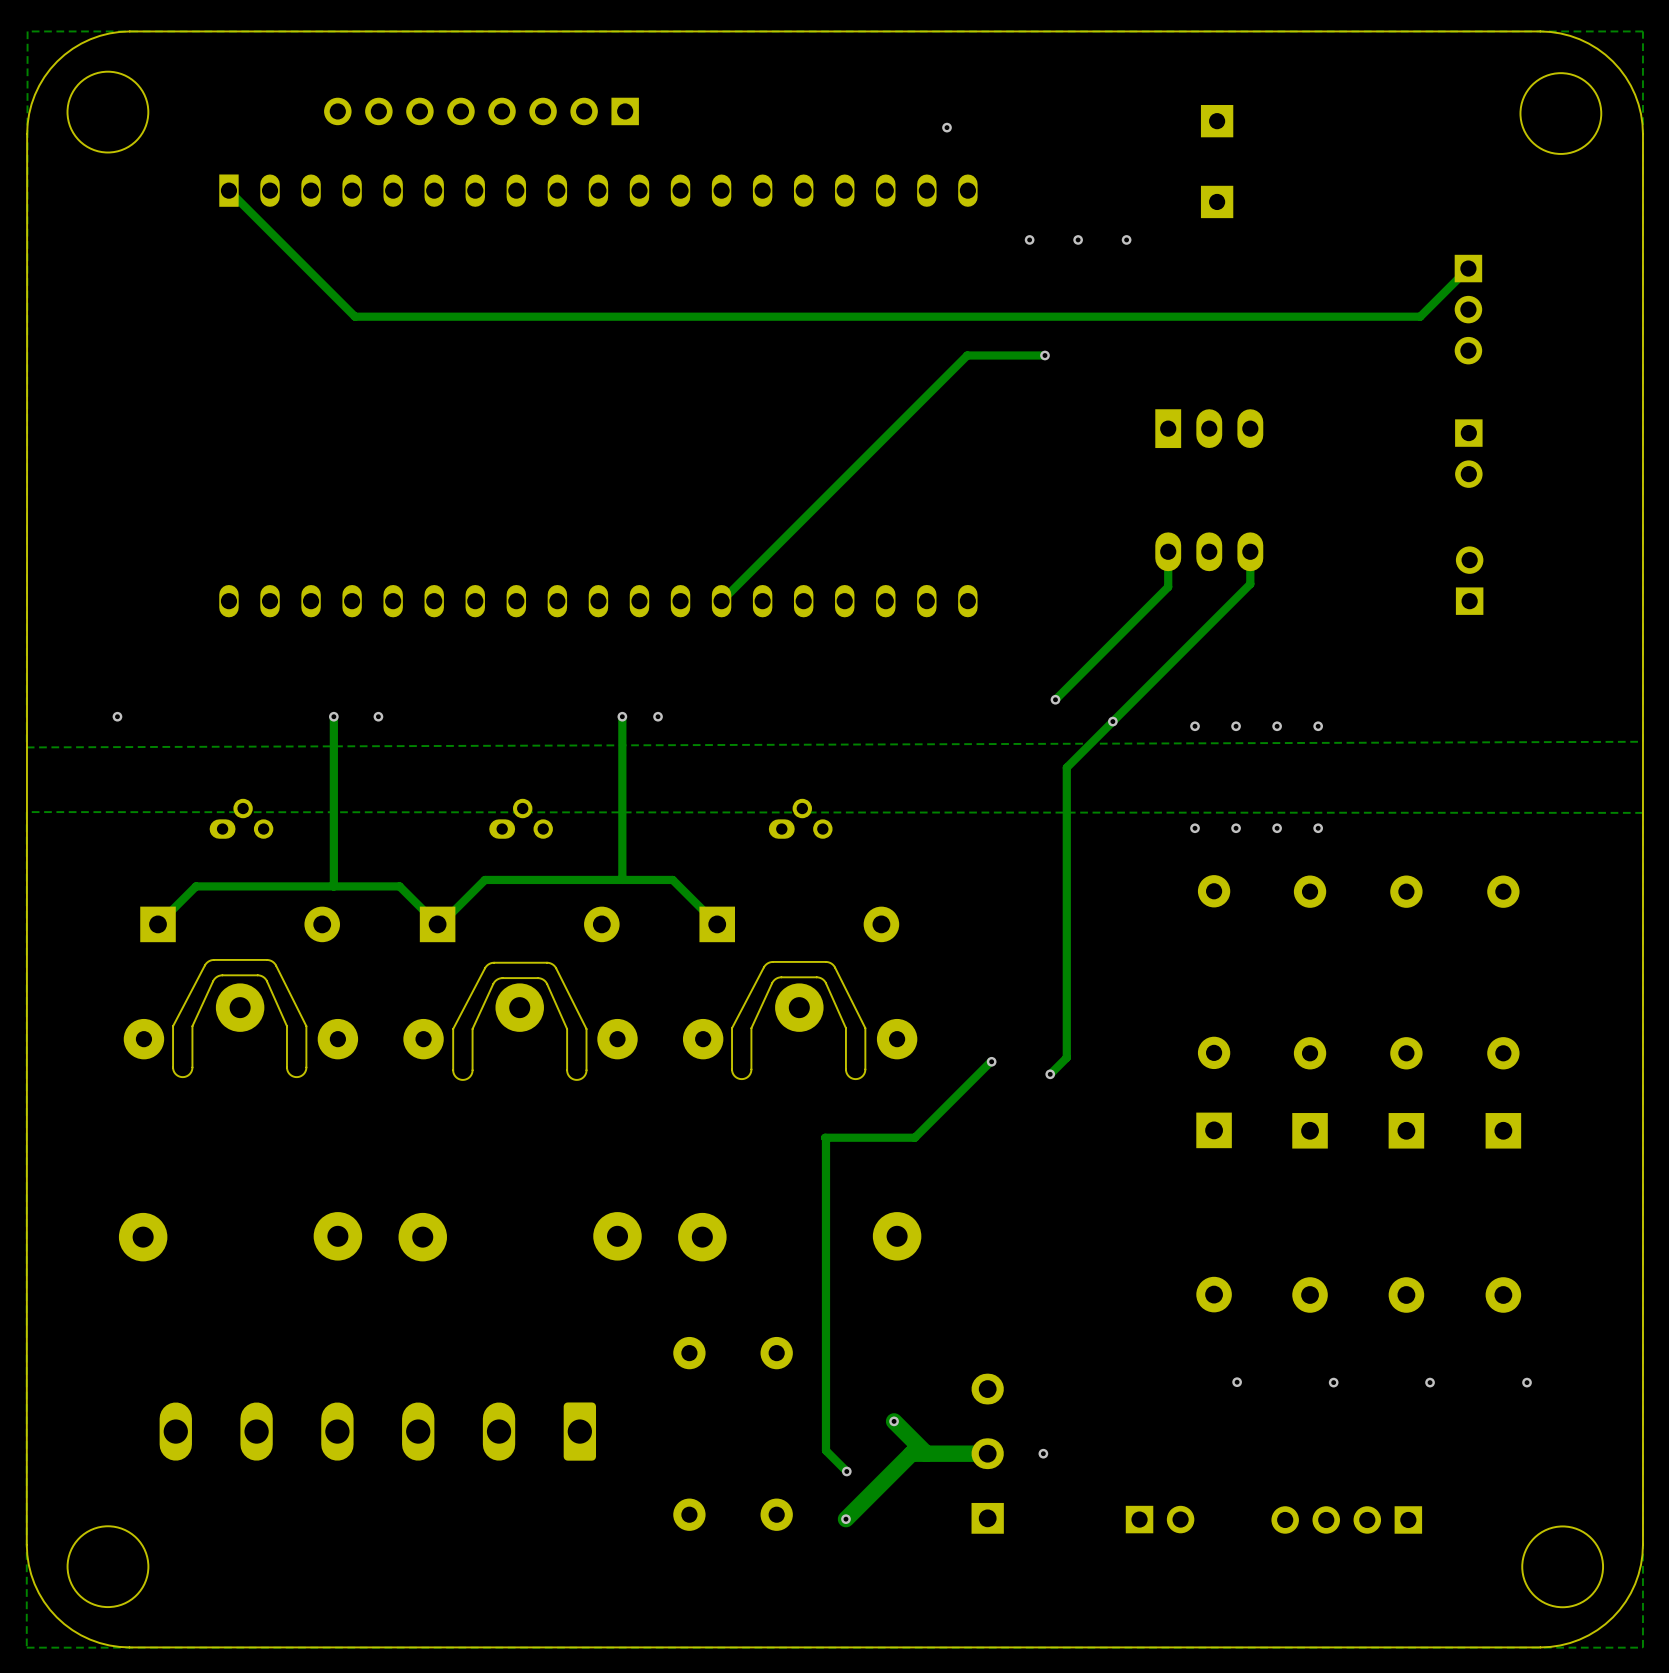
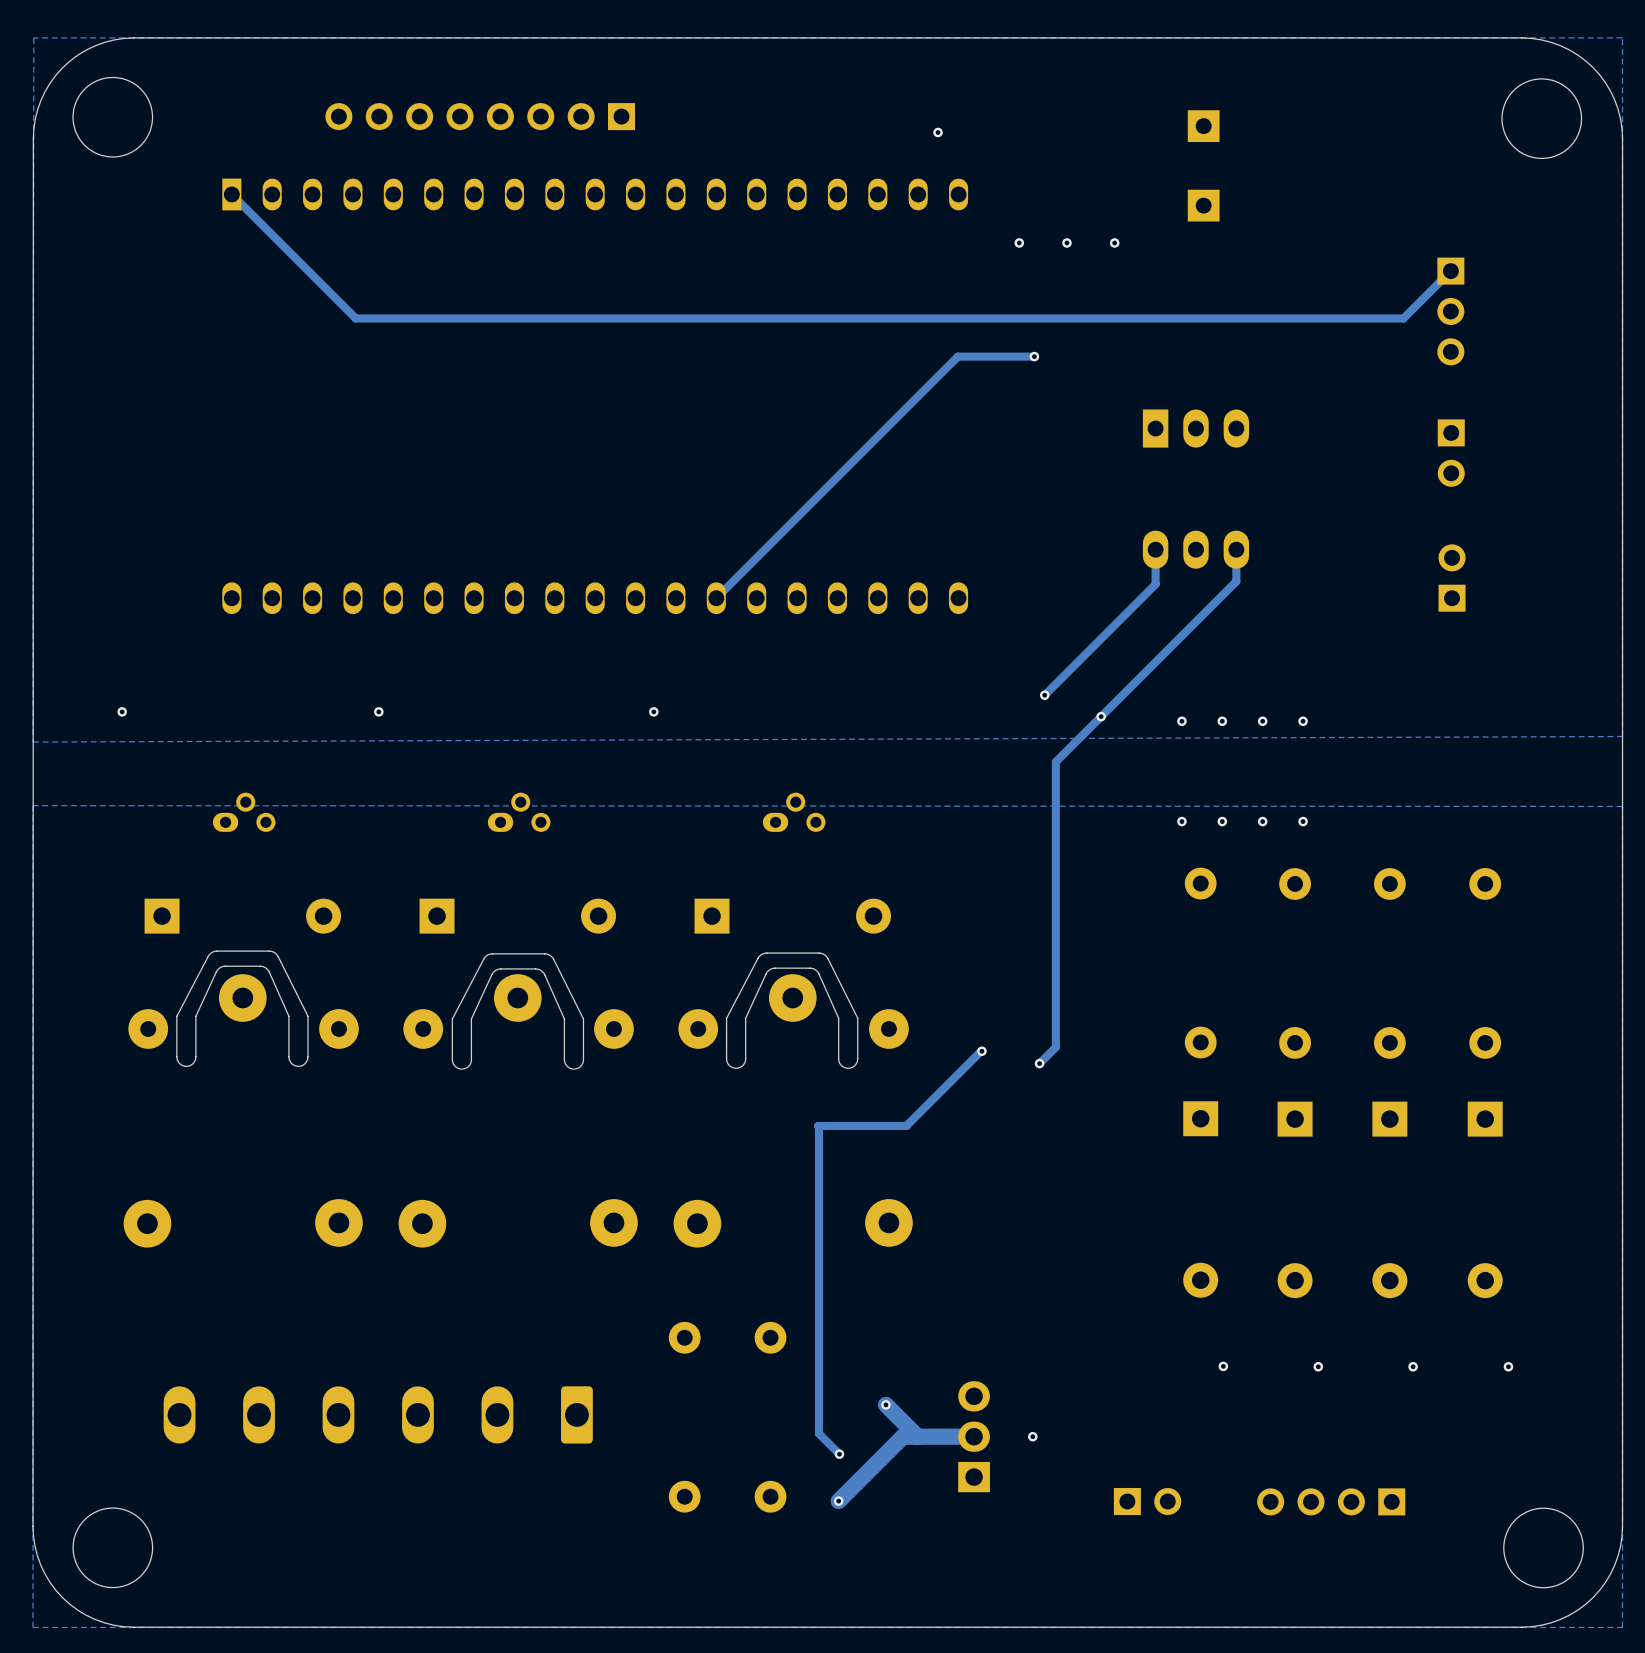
track: (333, 716) (333, 886) -> none
via: (333, 716) -> none
track: (622, 716) (622, 879) -> none
via: (622, 716) -> none
track: (717, 924) (672, 879) (484, 879) (440, 924) (437, 924) (399, 886) (195, 886) (158, 924) -> none
part footprint: [971, 1373, 1004, 1534] -> [958, 1381, 990, 1493]

